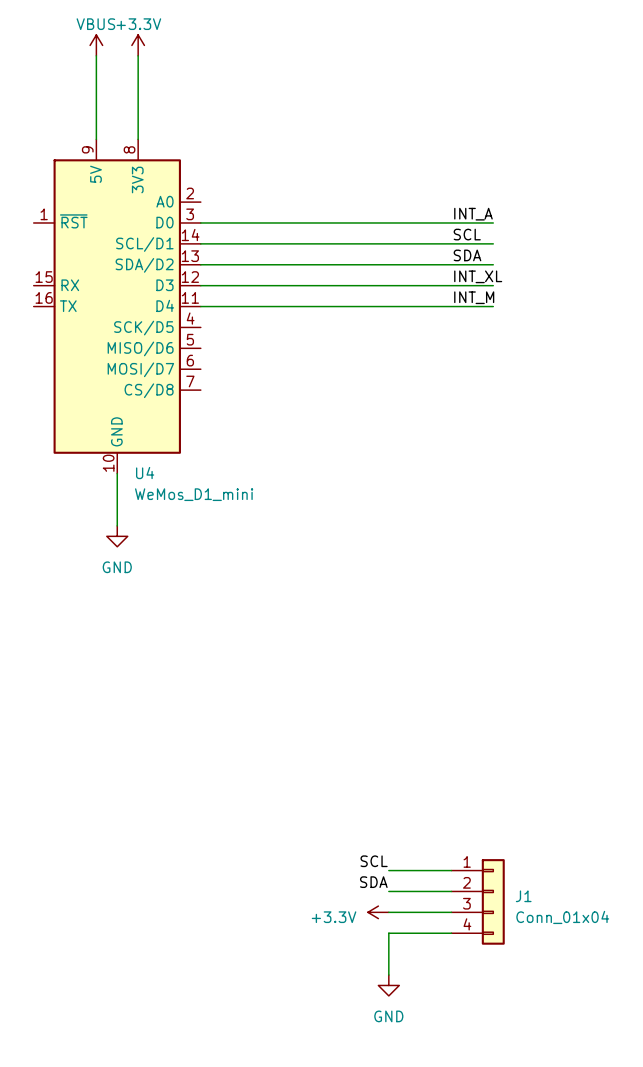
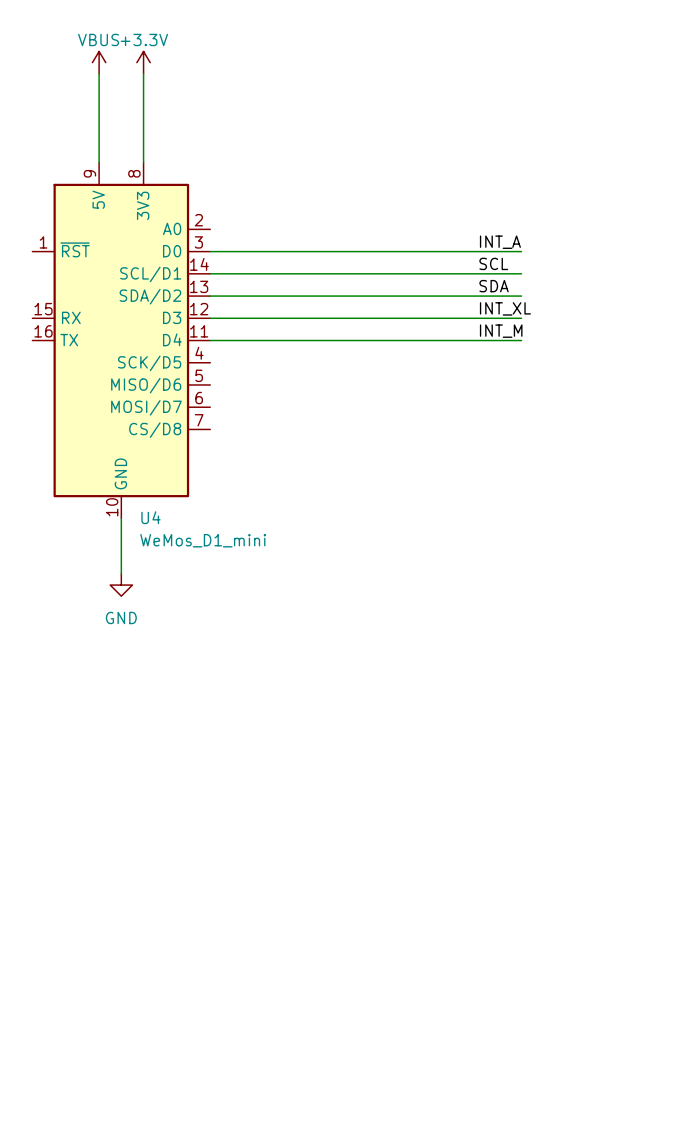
label: SCL (374, 861) -> none
wire: (388, 870) (451, 870) -> none
label: SDA (373, 882) -> none
wire: (388, 891) (451, 891) -> none
J1: Conn_01x04 (478, 901) -> none
power symbol: +3.3V (378, 912) -> none
wire: (388, 912) (451, 912) -> none
wire: (451, 933) (388, 933) (388, 975) -> none
power symbol: GND (388, 985) -> none

